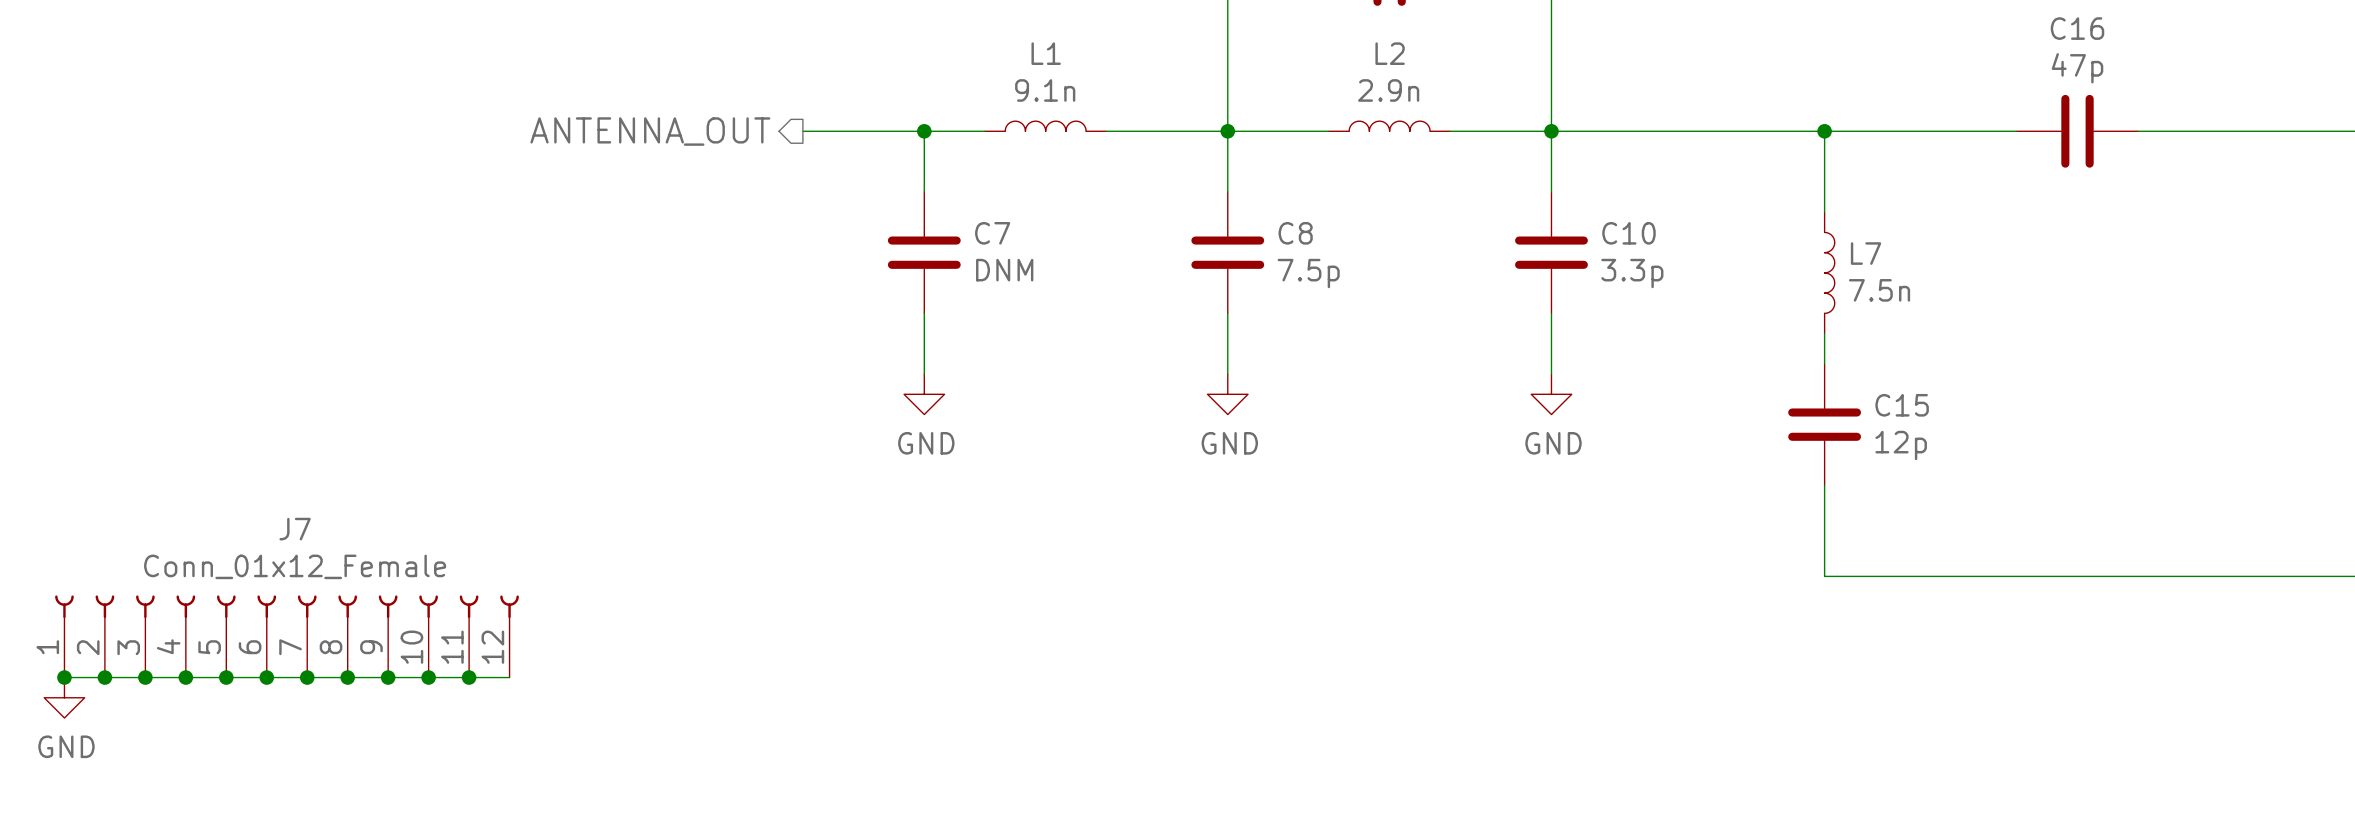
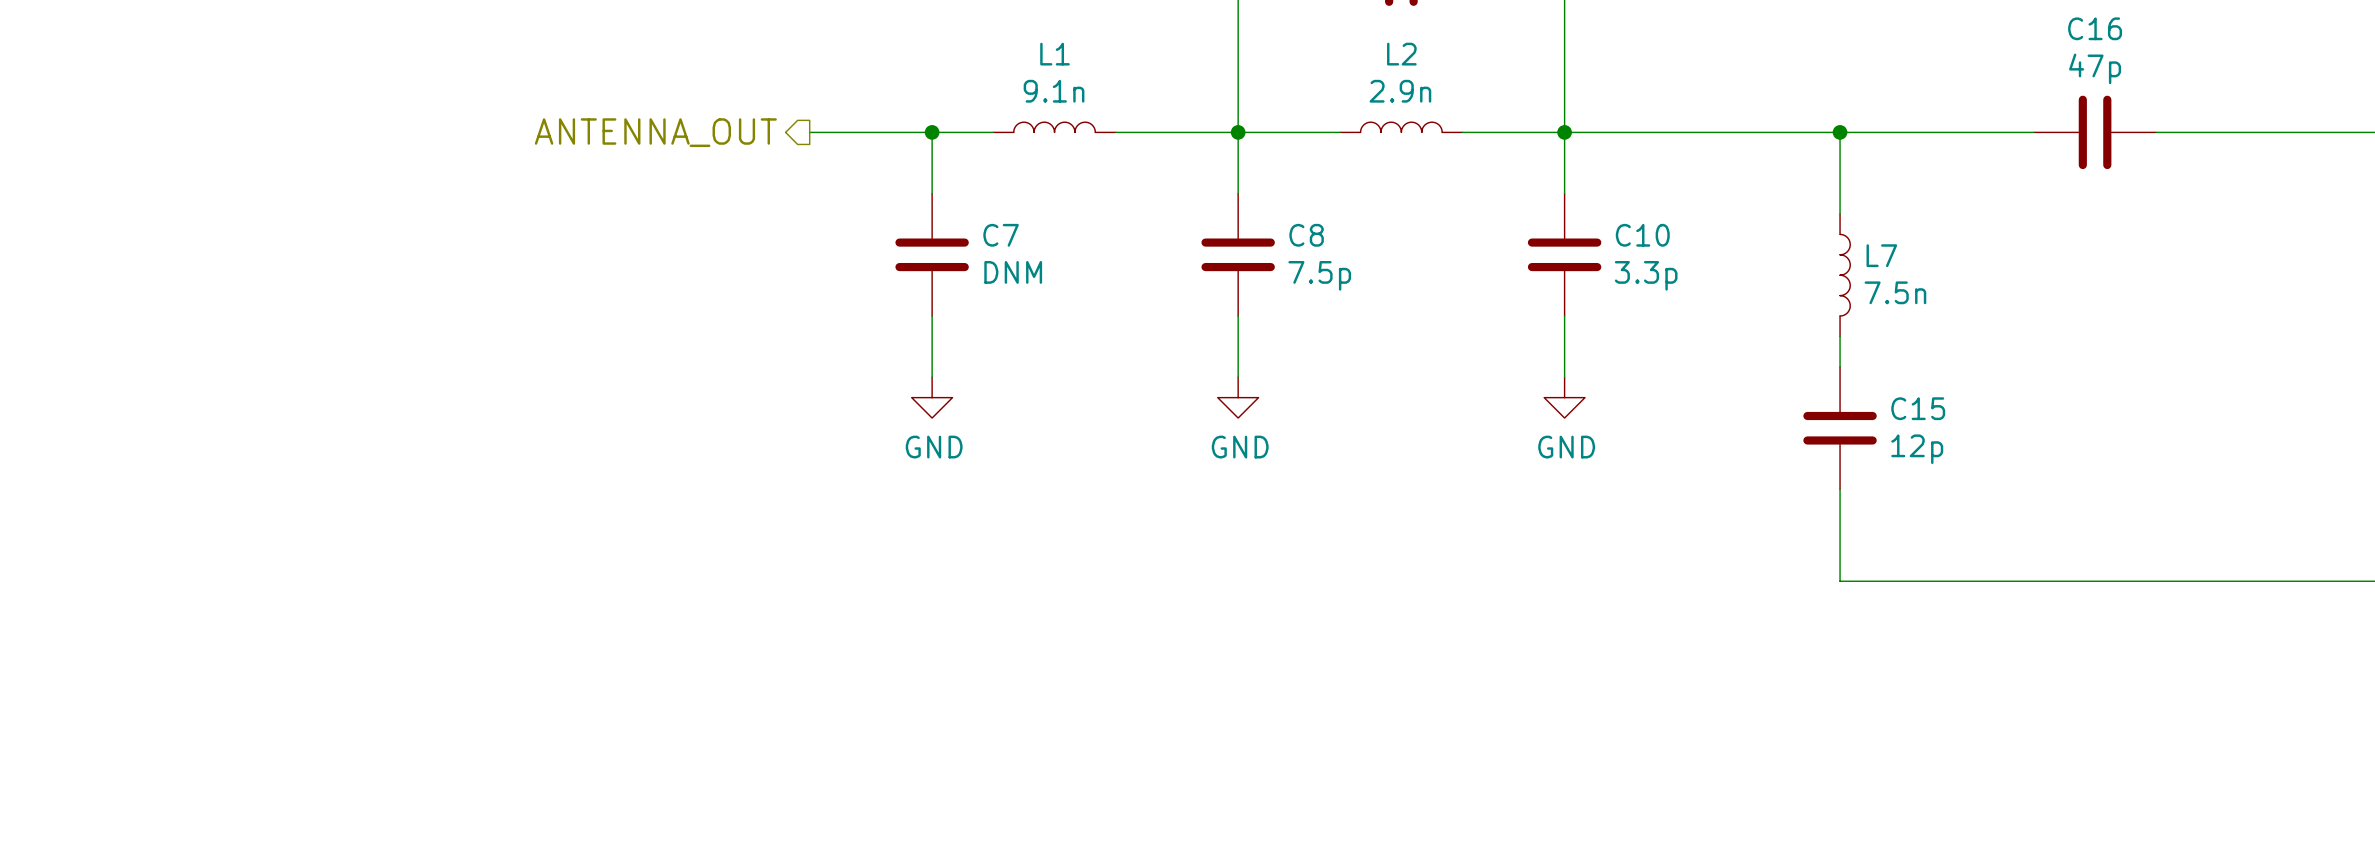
J7: Conn_01x12_Female (287, 636) -> none
wire: (64, 677) (509, 677) -> none
junction: (64, 677) -> none
junction: (104, 677) -> none
junction: (145, 677) -> none
junction: (185, 677) -> none
junction: (226, 677) -> none
junction: (266, 677) -> none
junction: (307, 677) -> none
junction: (347, 677) -> none
junction: (388, 677) -> none
junction: (428, 677) -> none
junction: (469, 677) -> none
power symbol: GND (64, 697) -> none

